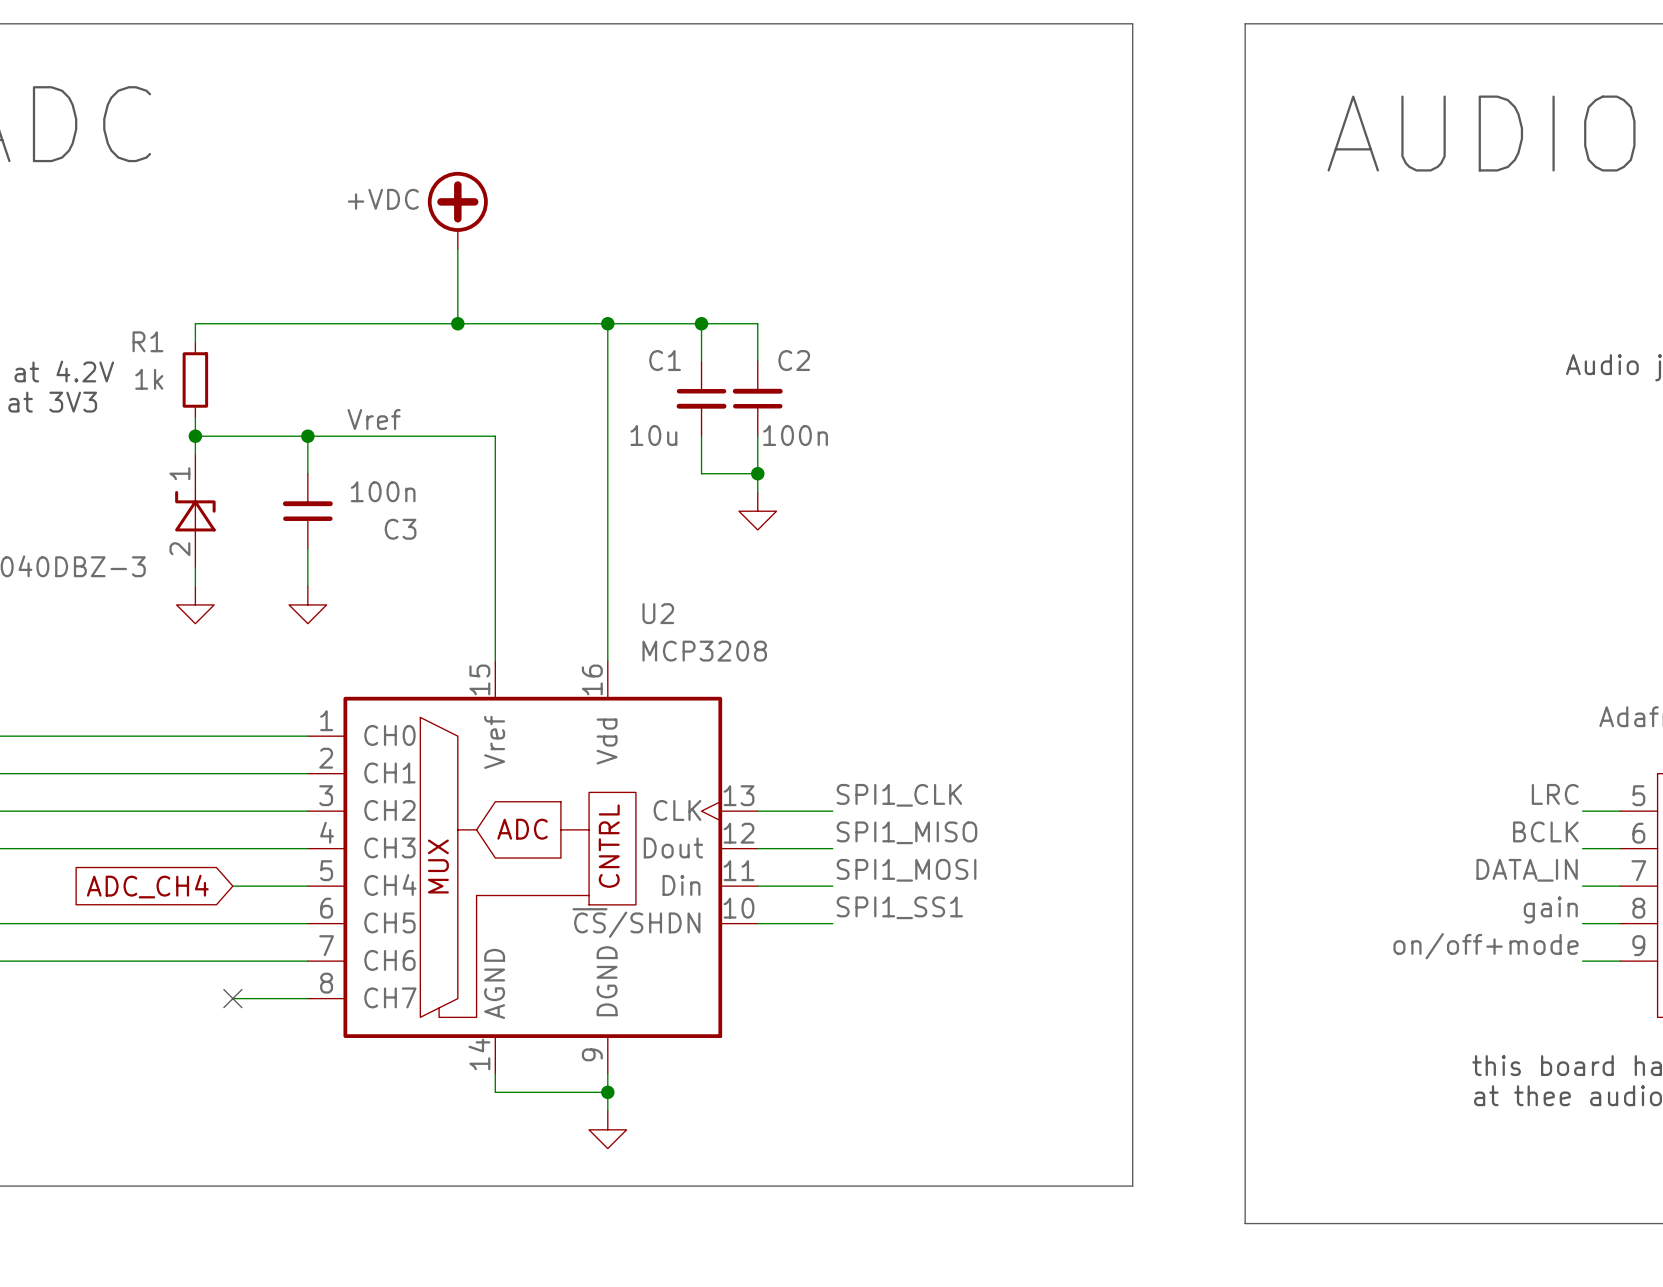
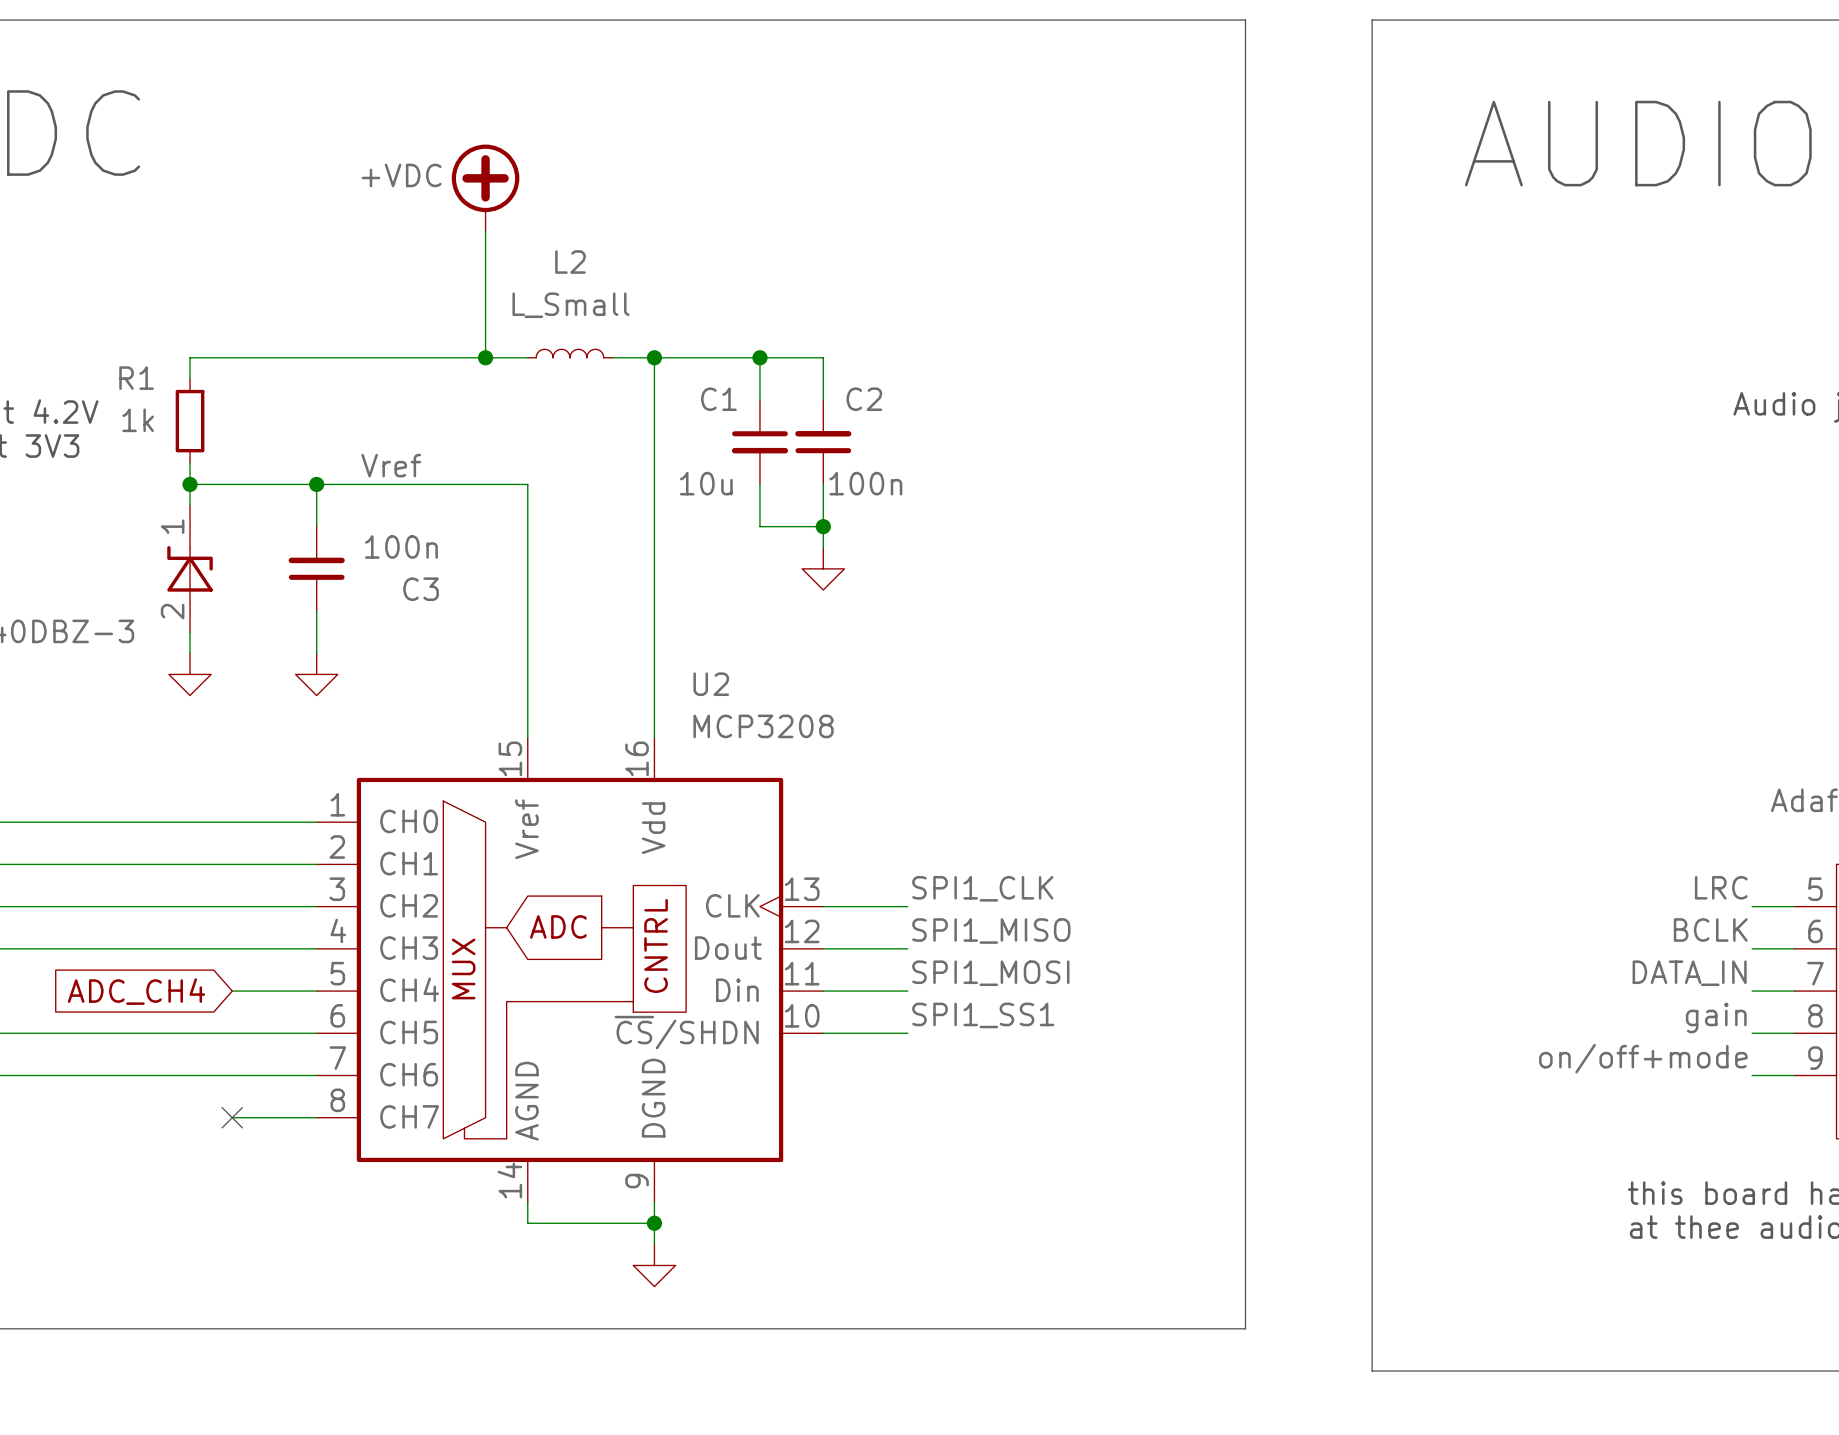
power symbol position: +VDC (457, 210) -> +VDC (485, 187)
L2: none -> L_Small (569, 353)
wire: (495, 323) (570, 323) -> none

